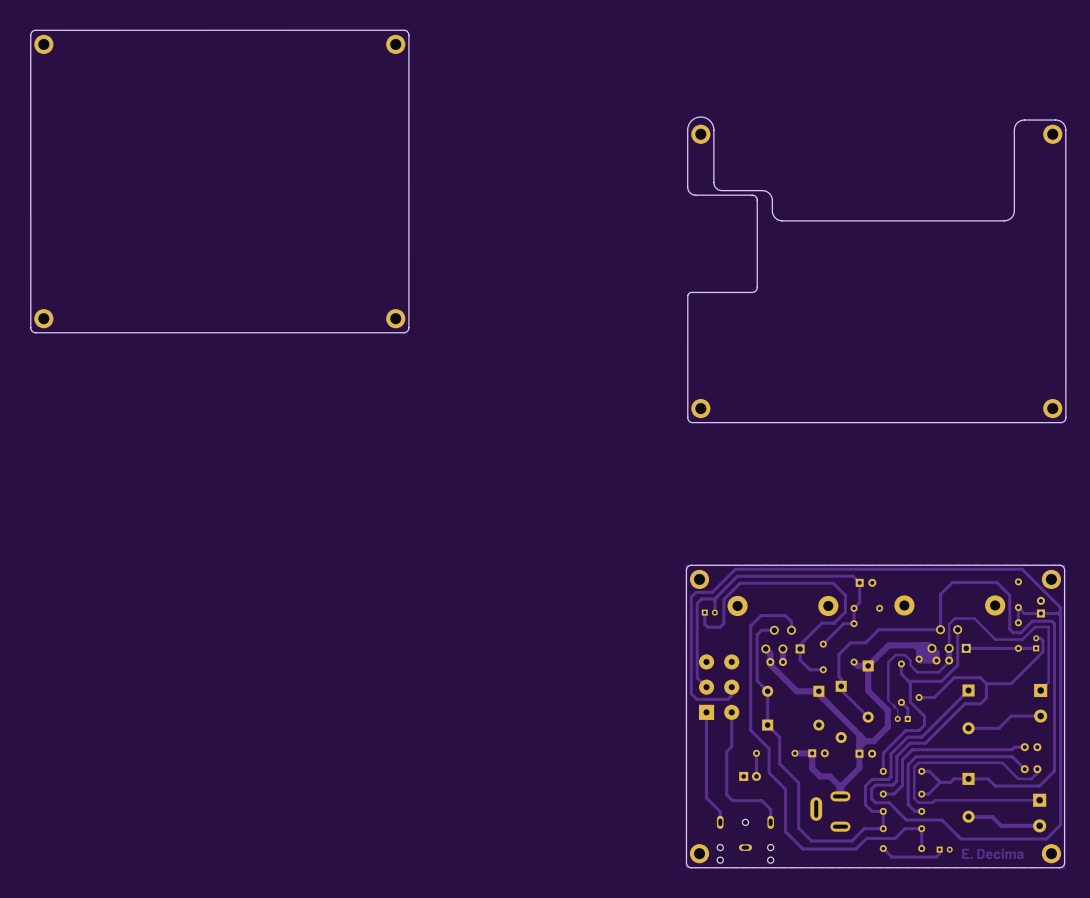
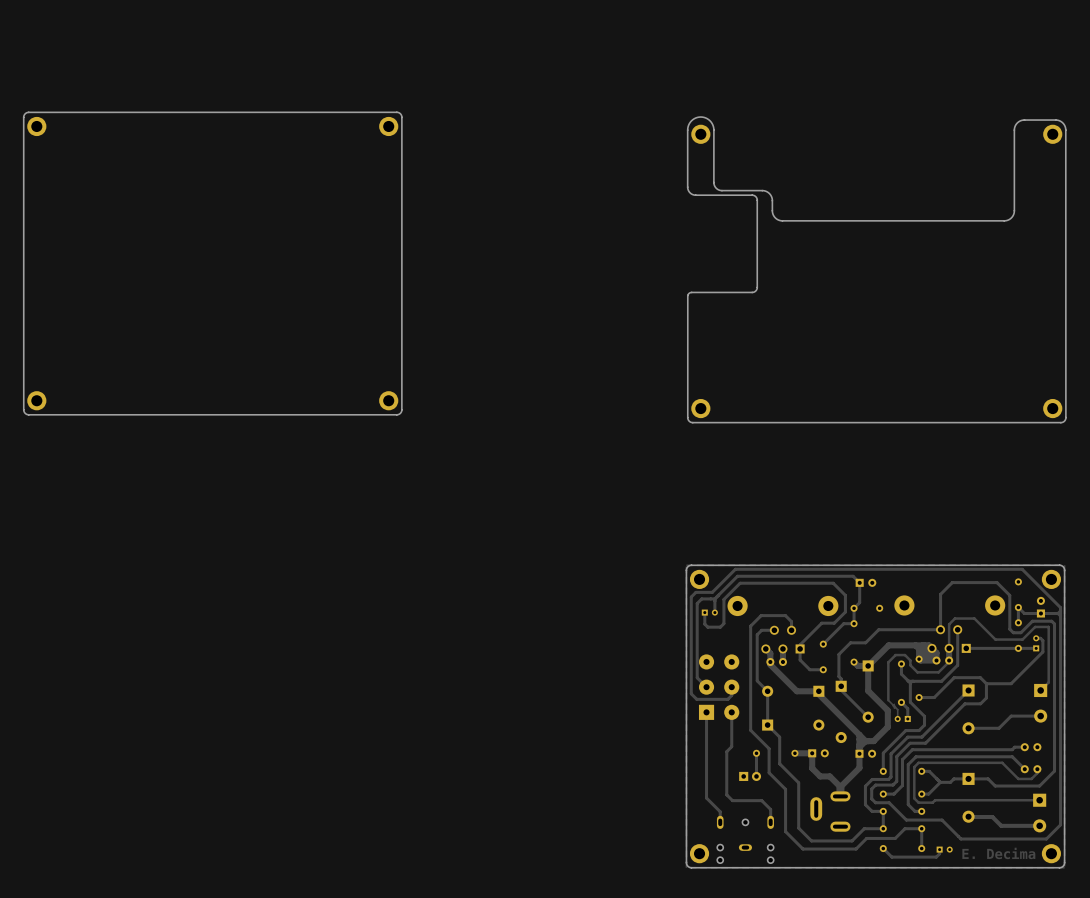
board edge: (403, 30) (32, 31) (30, 35) (31, 330) (35, 332) (407, 331) (408, 327) (408, 35) (403, 30) -> (396, 112) (401, 117) (401, 409) (399, 413) (28, 414) (24, 412) (23, 117) (25, 113) (396, 112)
part position: (43, 44) -> (36, 126)
part position: (395, 44) -> (388, 126)
part position: (43, 318) -> (36, 400)
part position: (395, 318) -> (388, 400)

